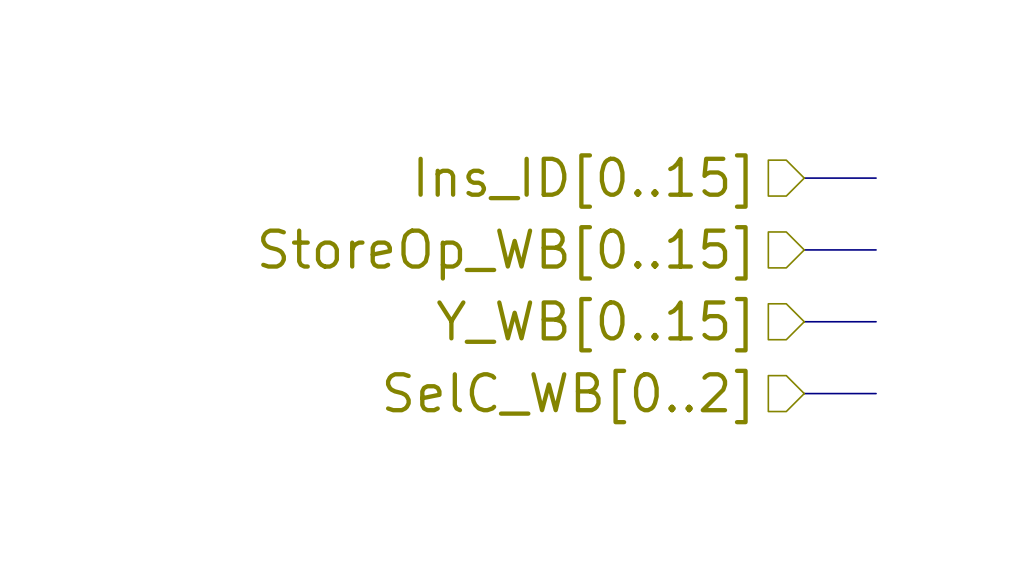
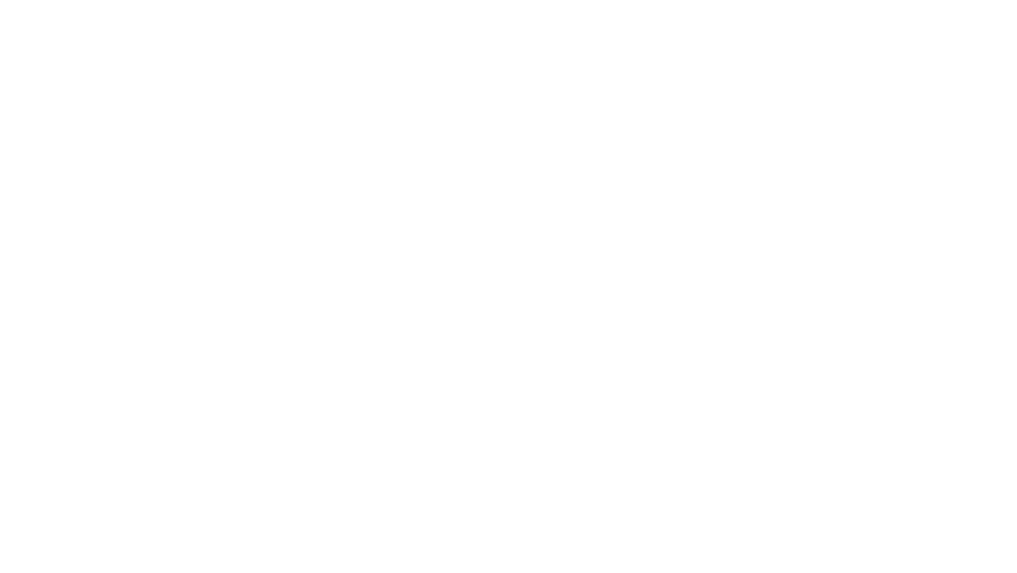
bus: (804, 178) (876, 178) -> none
hierarchical label: Ins_ID[0..15] (583, 181) -> none
bus: (804, 249) (876, 249) -> none
hierarchical label: StoreOp_WB[0..15] (504, 252) -> none
bus: (804, 321) (876, 321) -> none
hierarchical label: Y_WB[0..15] (592, 324) -> none
bus: (804, 393) (876, 393) -> none
hierarchical label: SelC_WB[0..2] (566, 396) -> none

